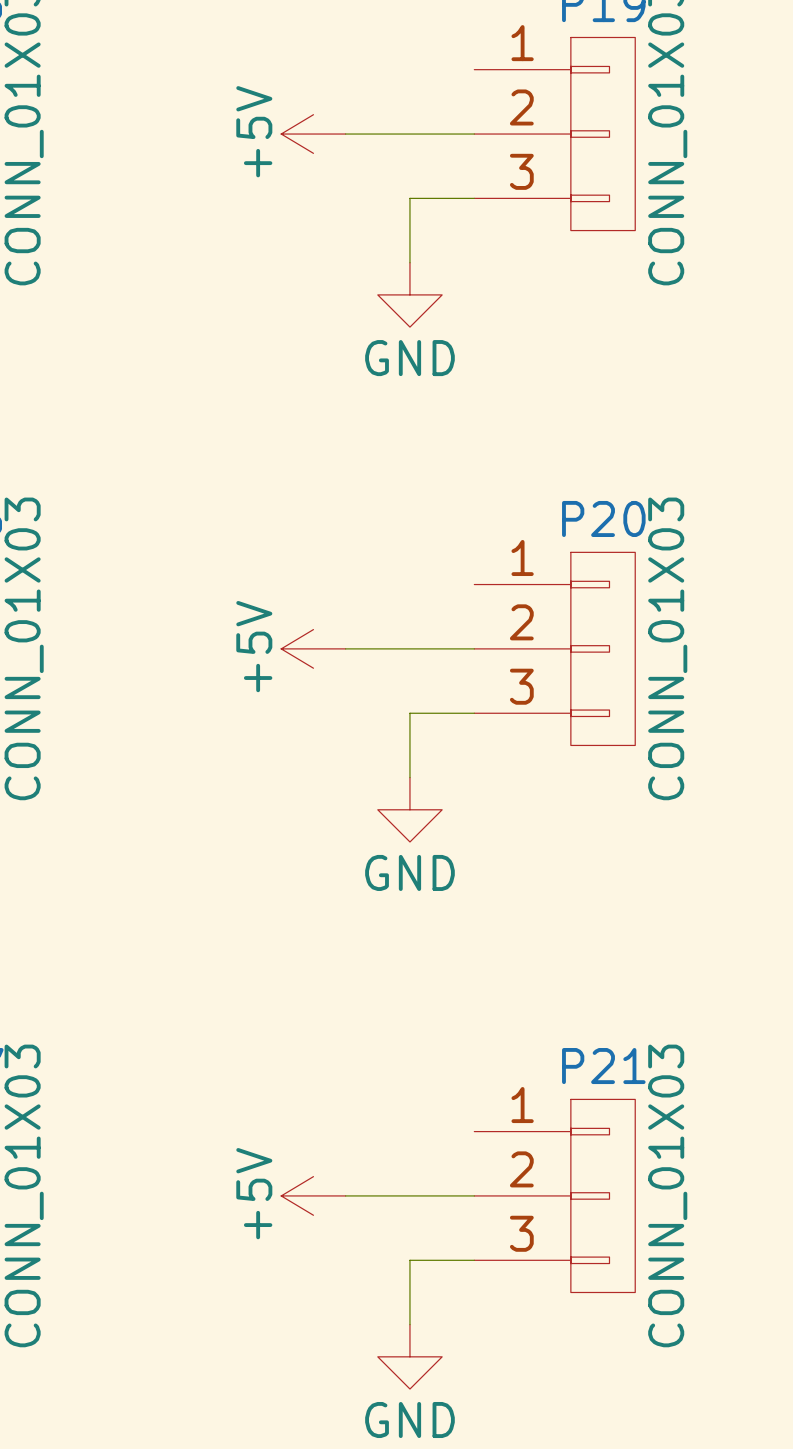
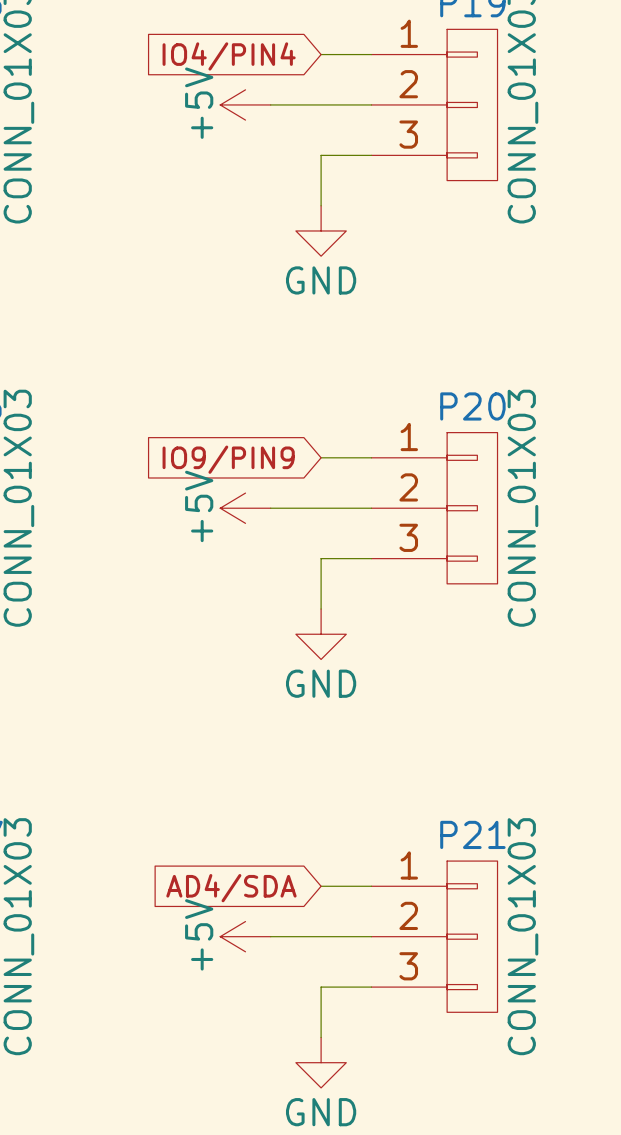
wire: none -> (321, 54) (371, 54)
global label: none -> IO4/PIN4 (229, 56)
wire: none -> (321, 457) (371, 457)
global label: none -> IO9/PIN9 (228, 459)
wire: none -> (321, 886) (371, 886)
global label: none -> AD4/SDA (231, 888)

